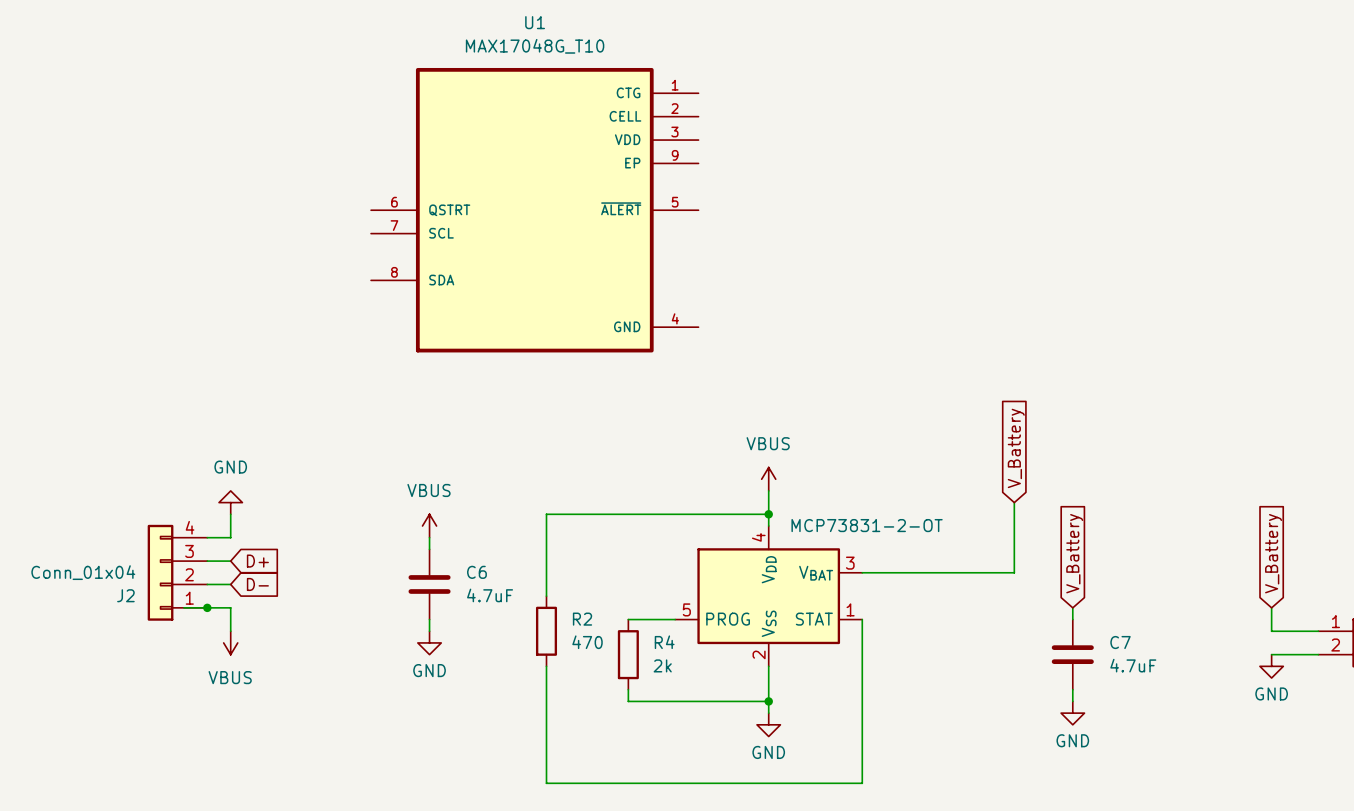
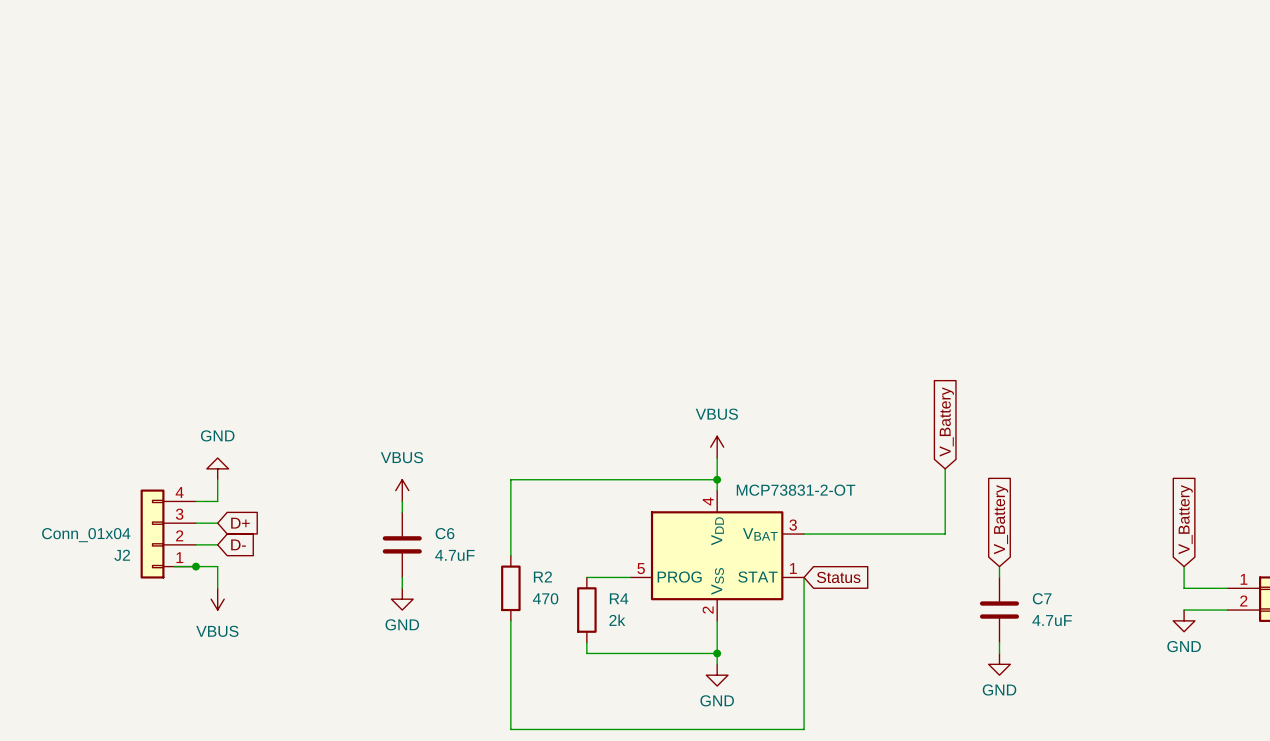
U1: MAX17048G_T10 (534, 210) -> none
global label: none -> Status (838, 577)

